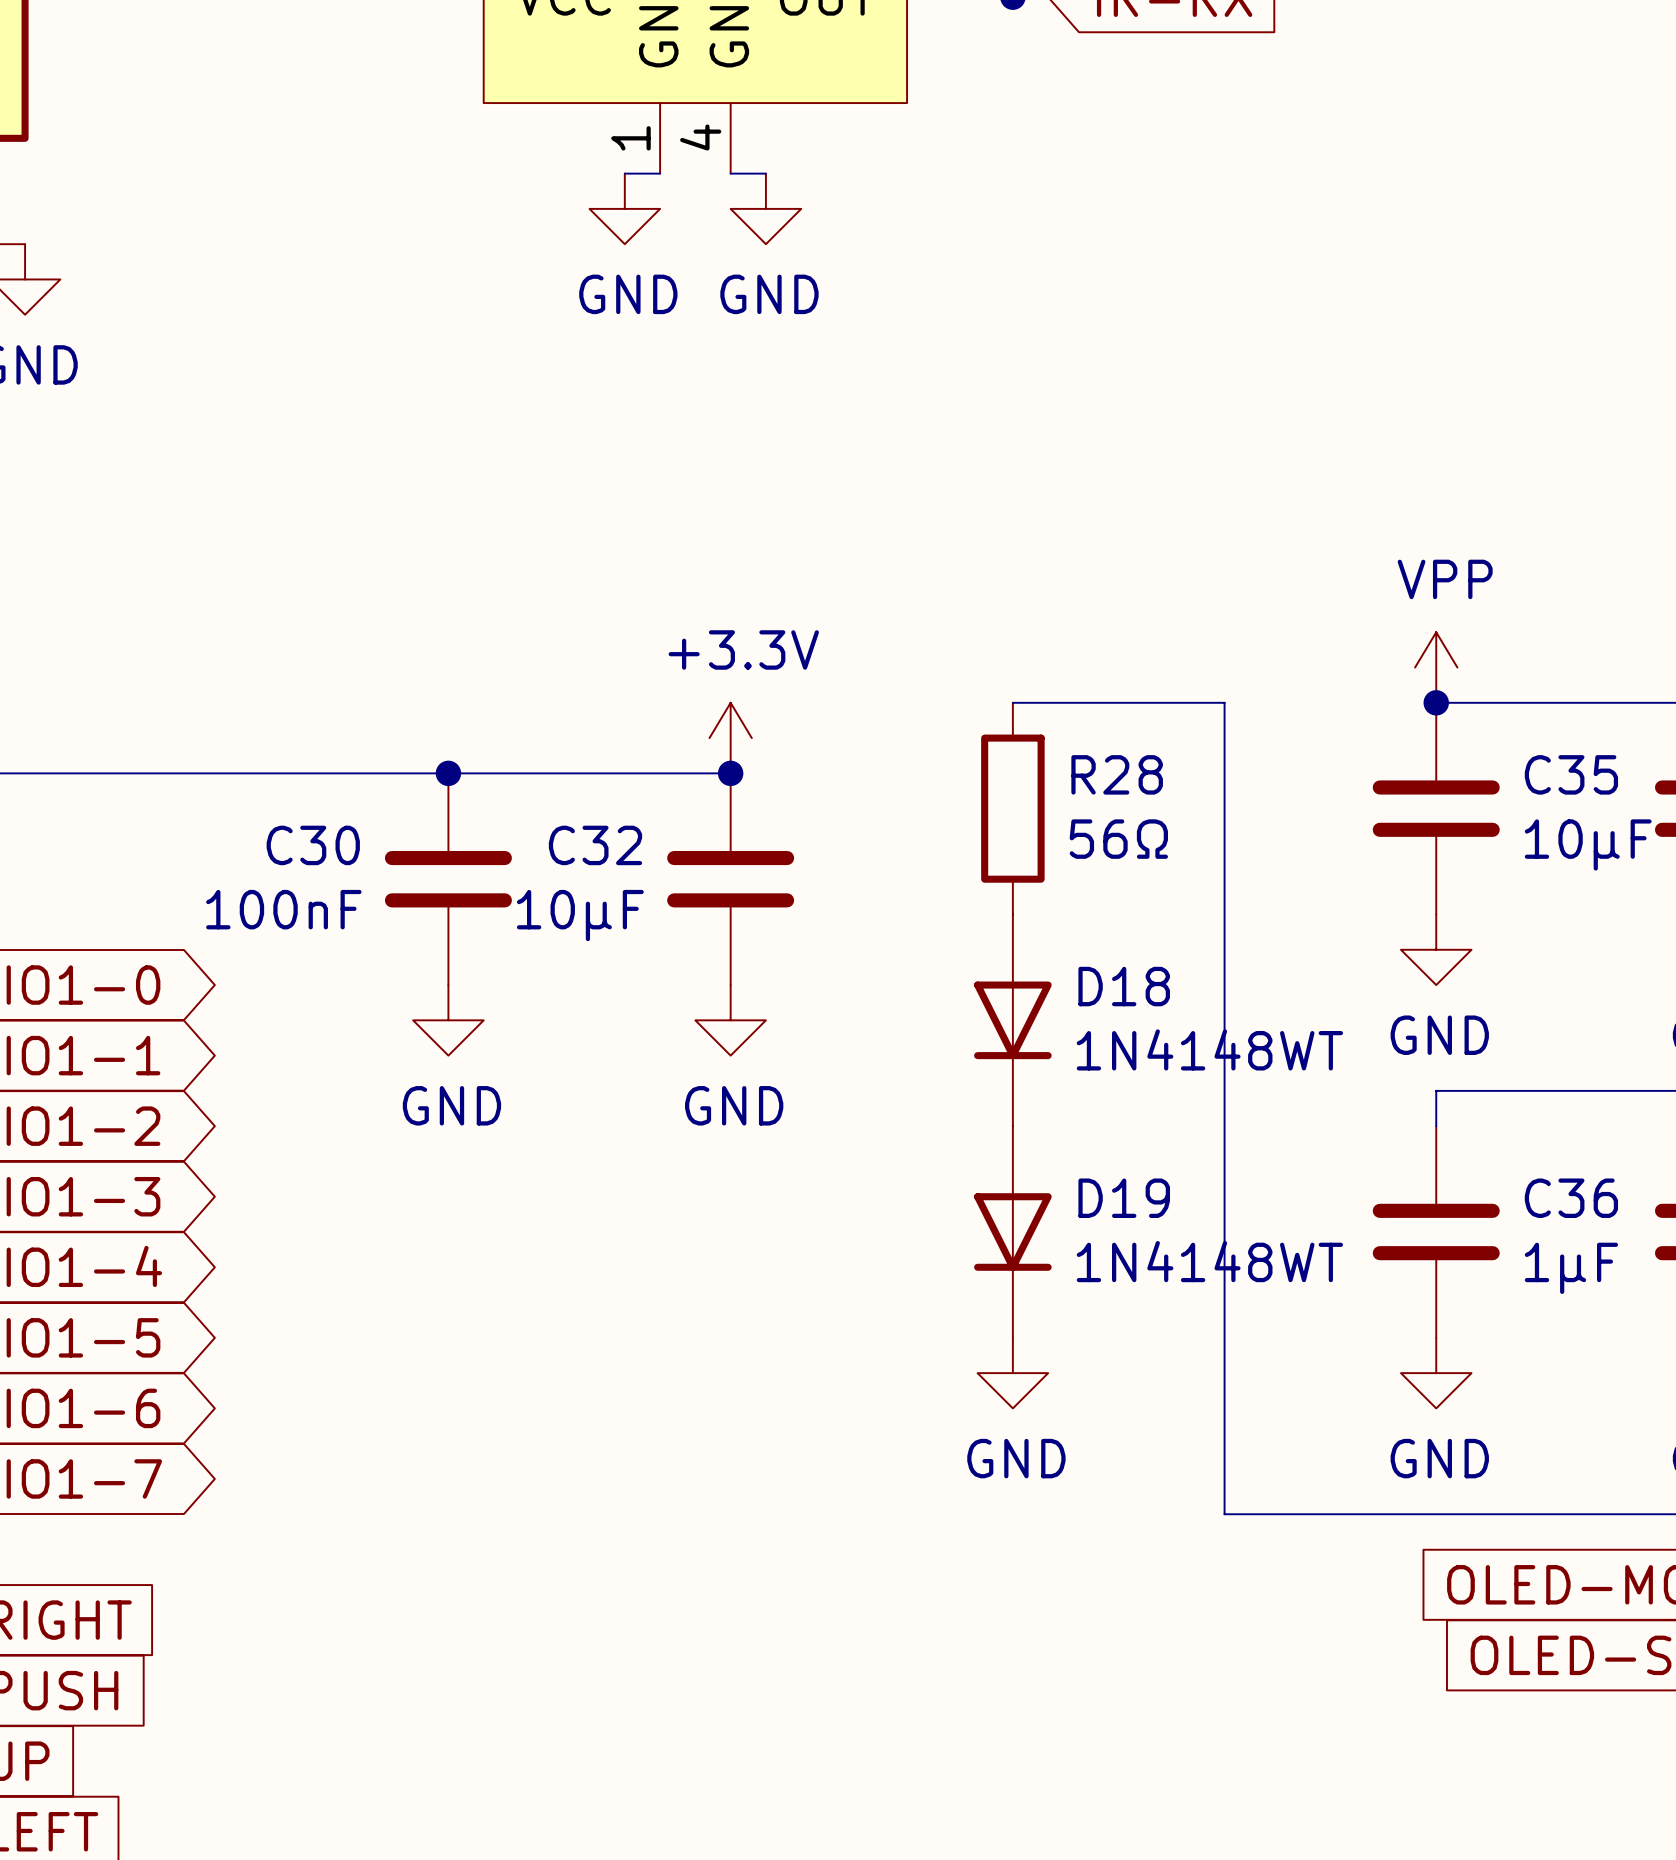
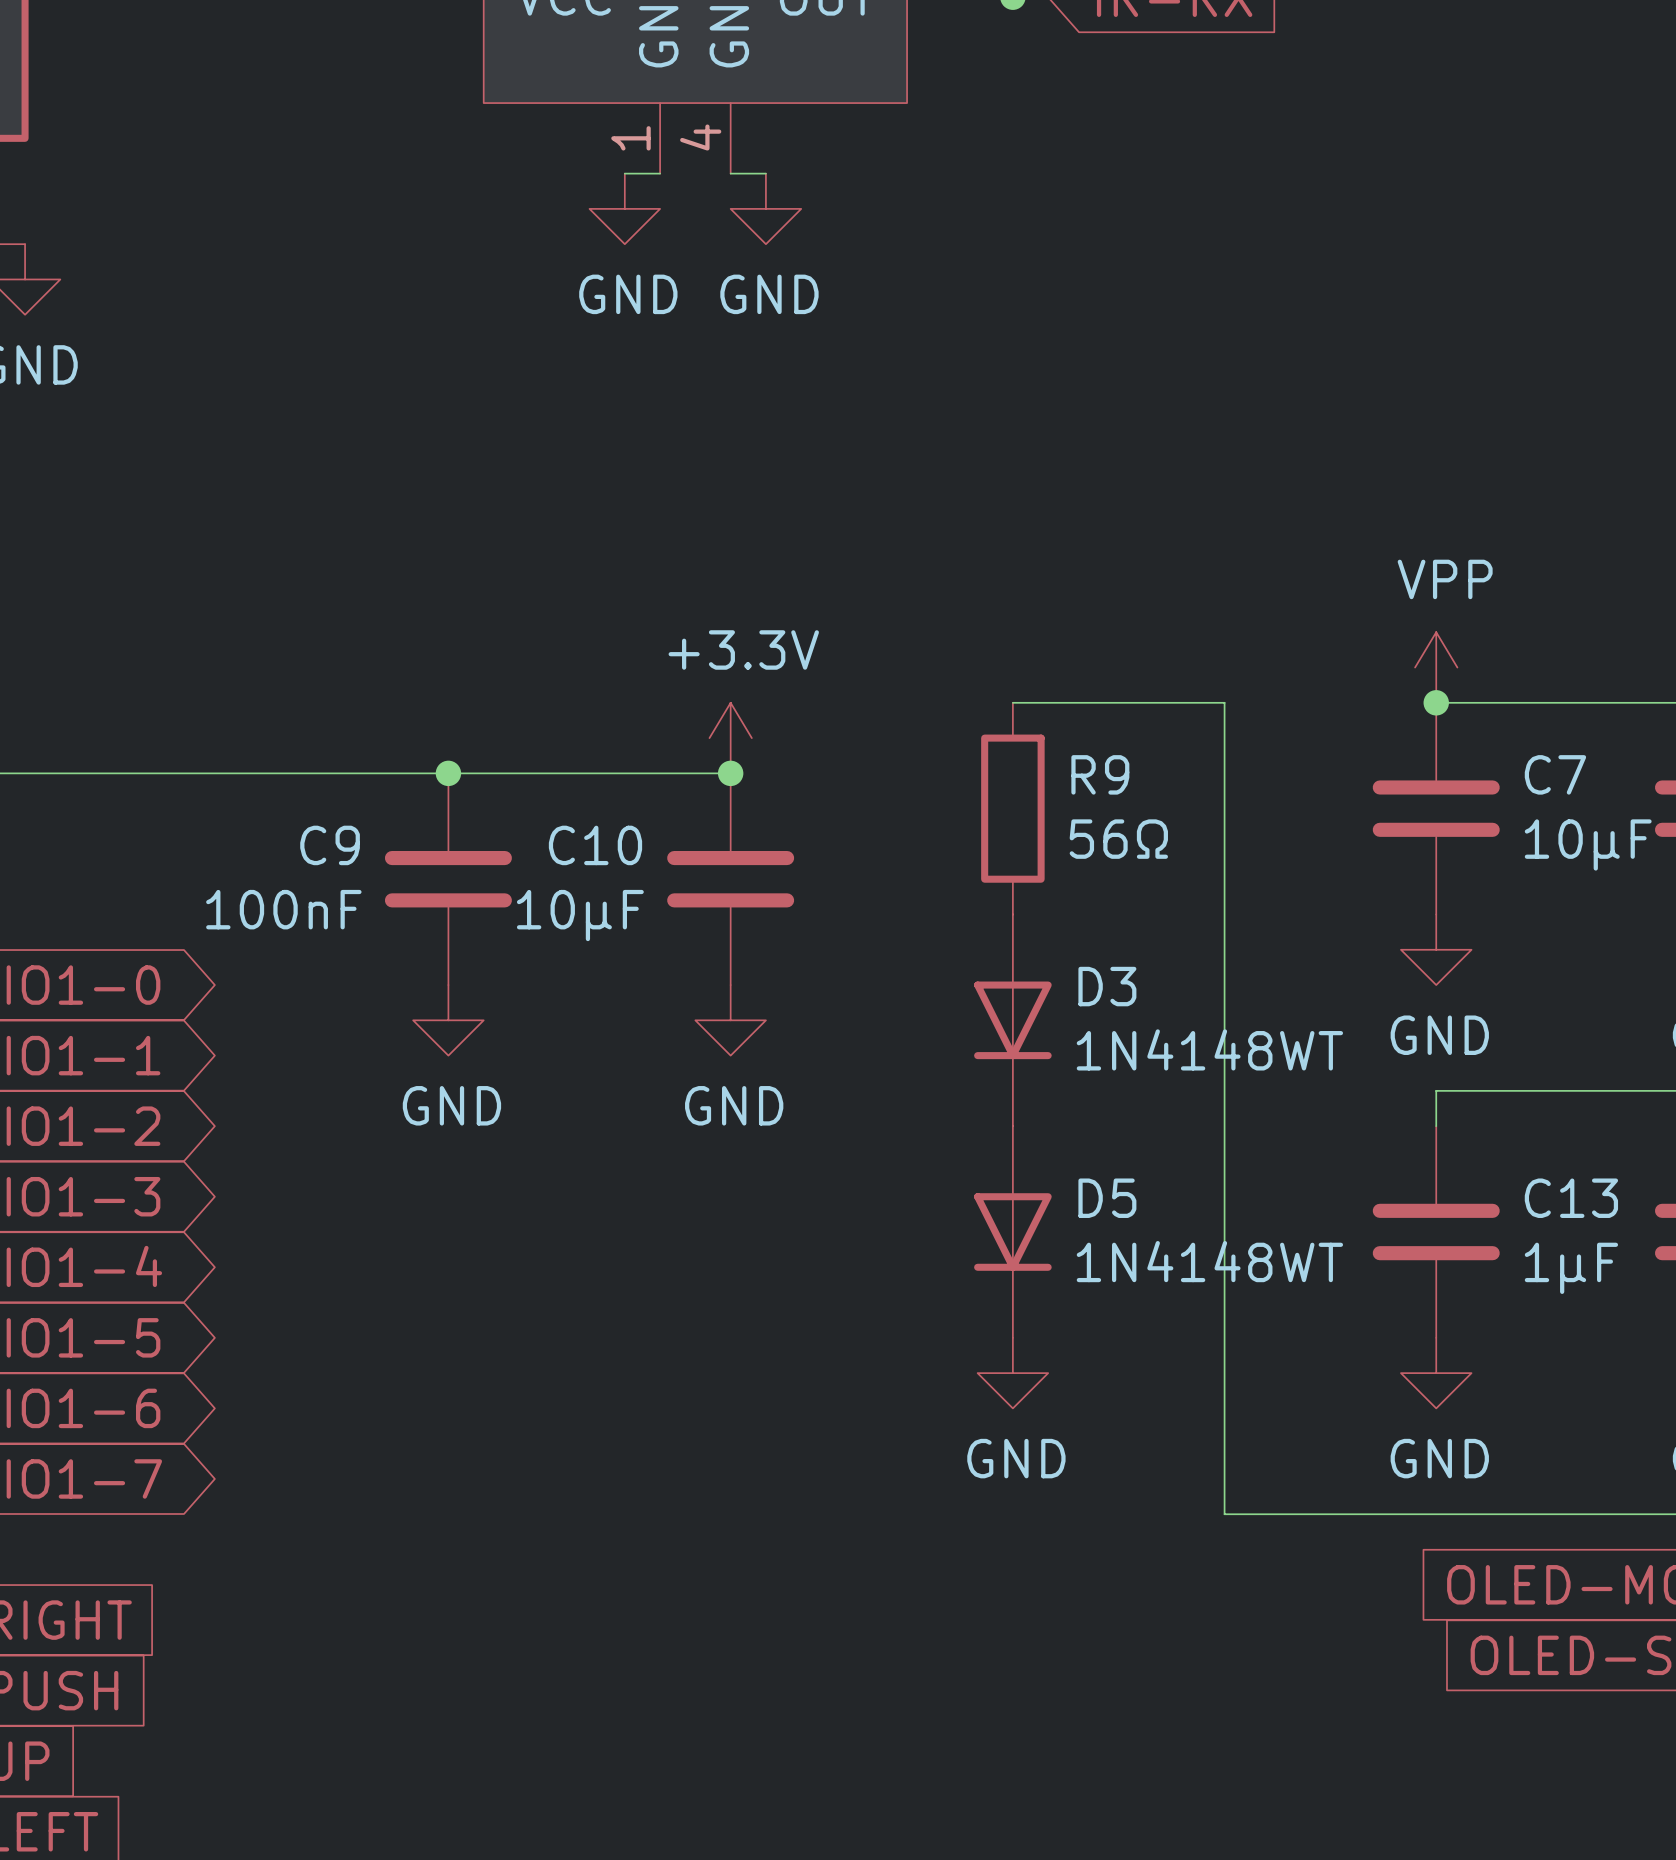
R28 name: R28 (1117, 774) -> R9 (1100, 774)
C35 name: C35 (1571, 774) -> C7 (1555, 774)
C30 name: C30 (313, 845) -> C9 (330, 845)
C32 name: C32 (595, 845) -> C10 (595, 845)
D18 name: D18 (1124, 986) -> D3 (1107, 986)
D19 name: D19 (1124, 1198) -> D5 (1107, 1198)
C36 name: C36 (1571, 1198) -> C13 (1571, 1198)

